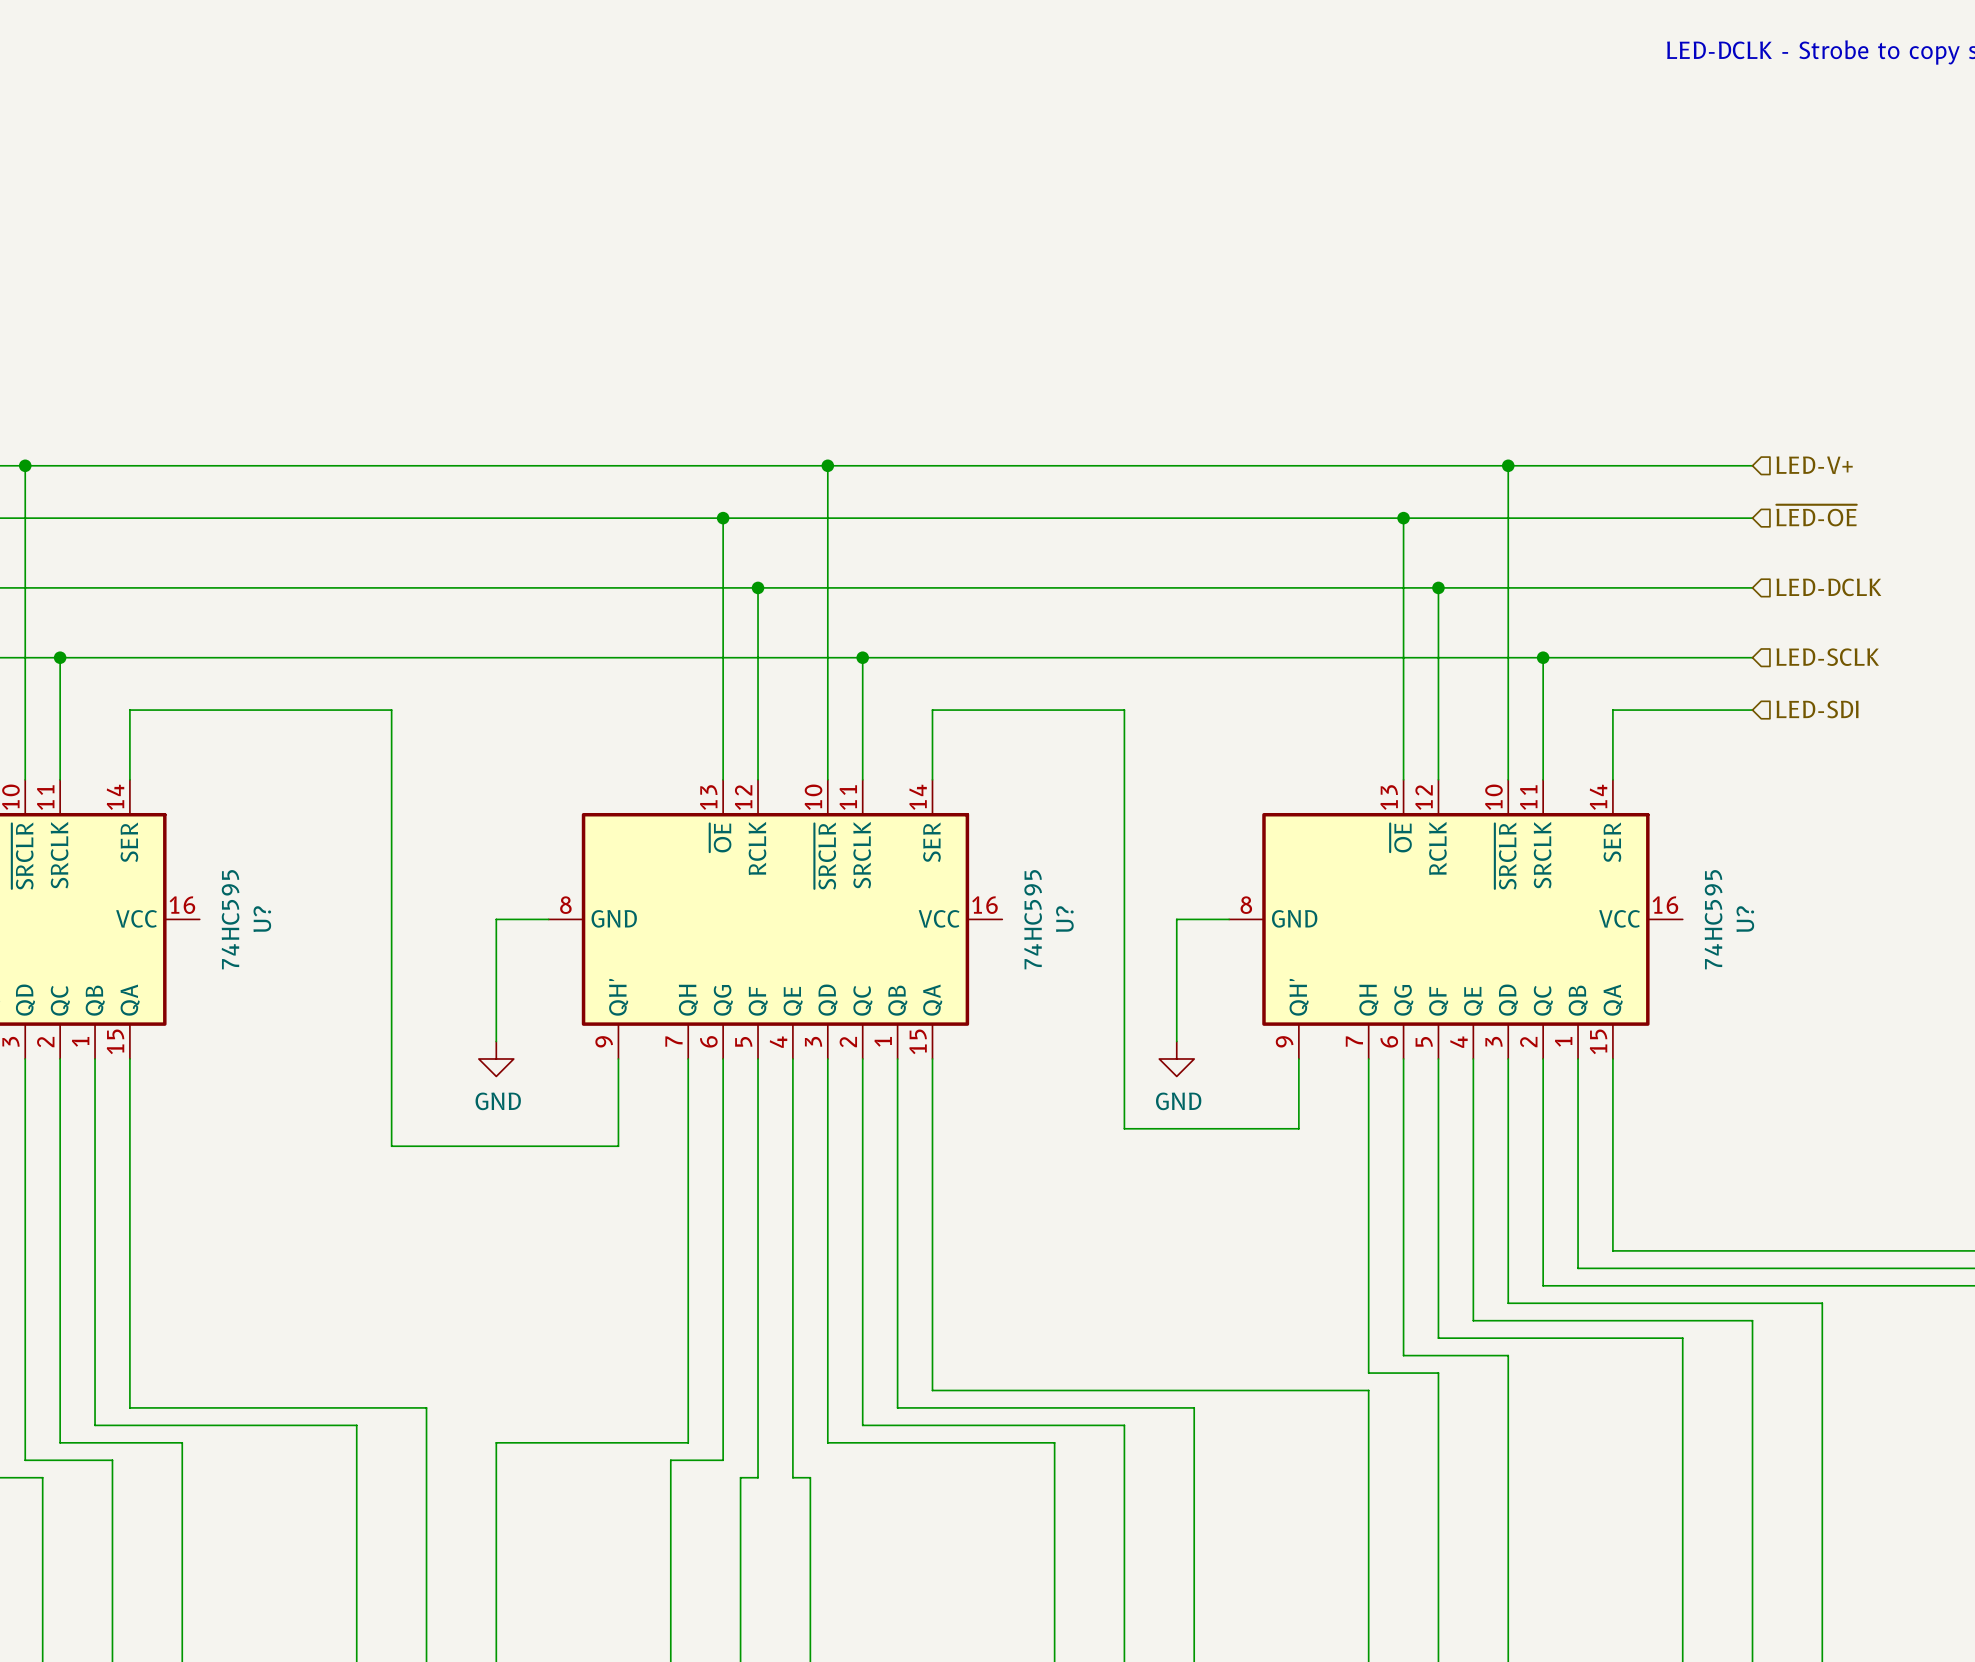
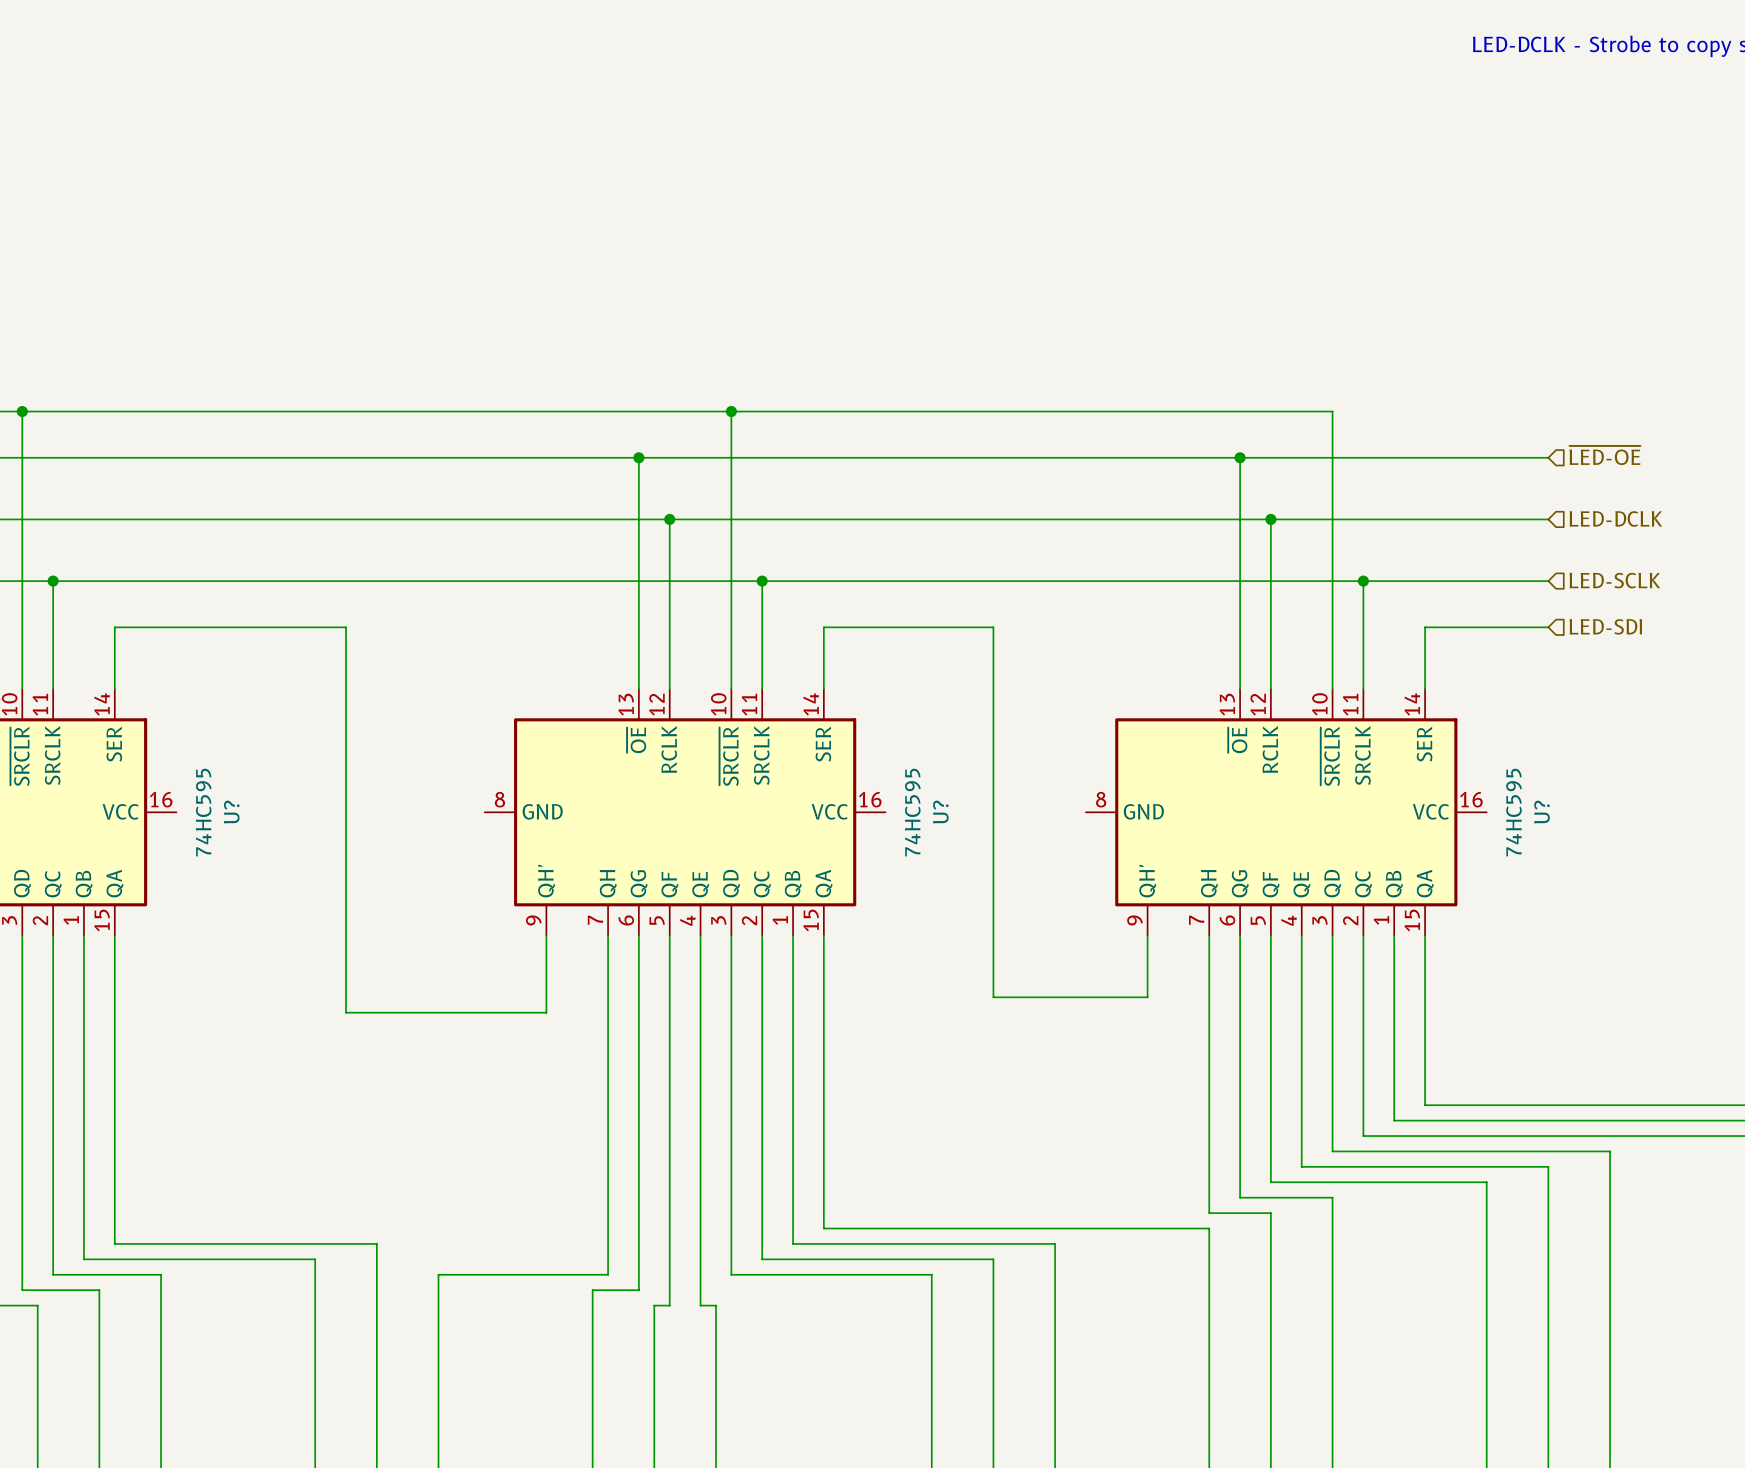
wire: (1508, 465) (1752, 465) -> none
junction: (1508, 465) -> none
hierarchical label: LED-V+ (1814, 465) -> none
wire: (548, 919) (496, 919) (496, 1041) -> none
wire: (1229, 919) (1176, 919) (1176, 1041) -> none
power symbol: GND (496, 1058) -> none
power symbol: GND (1176, 1058) -> none

